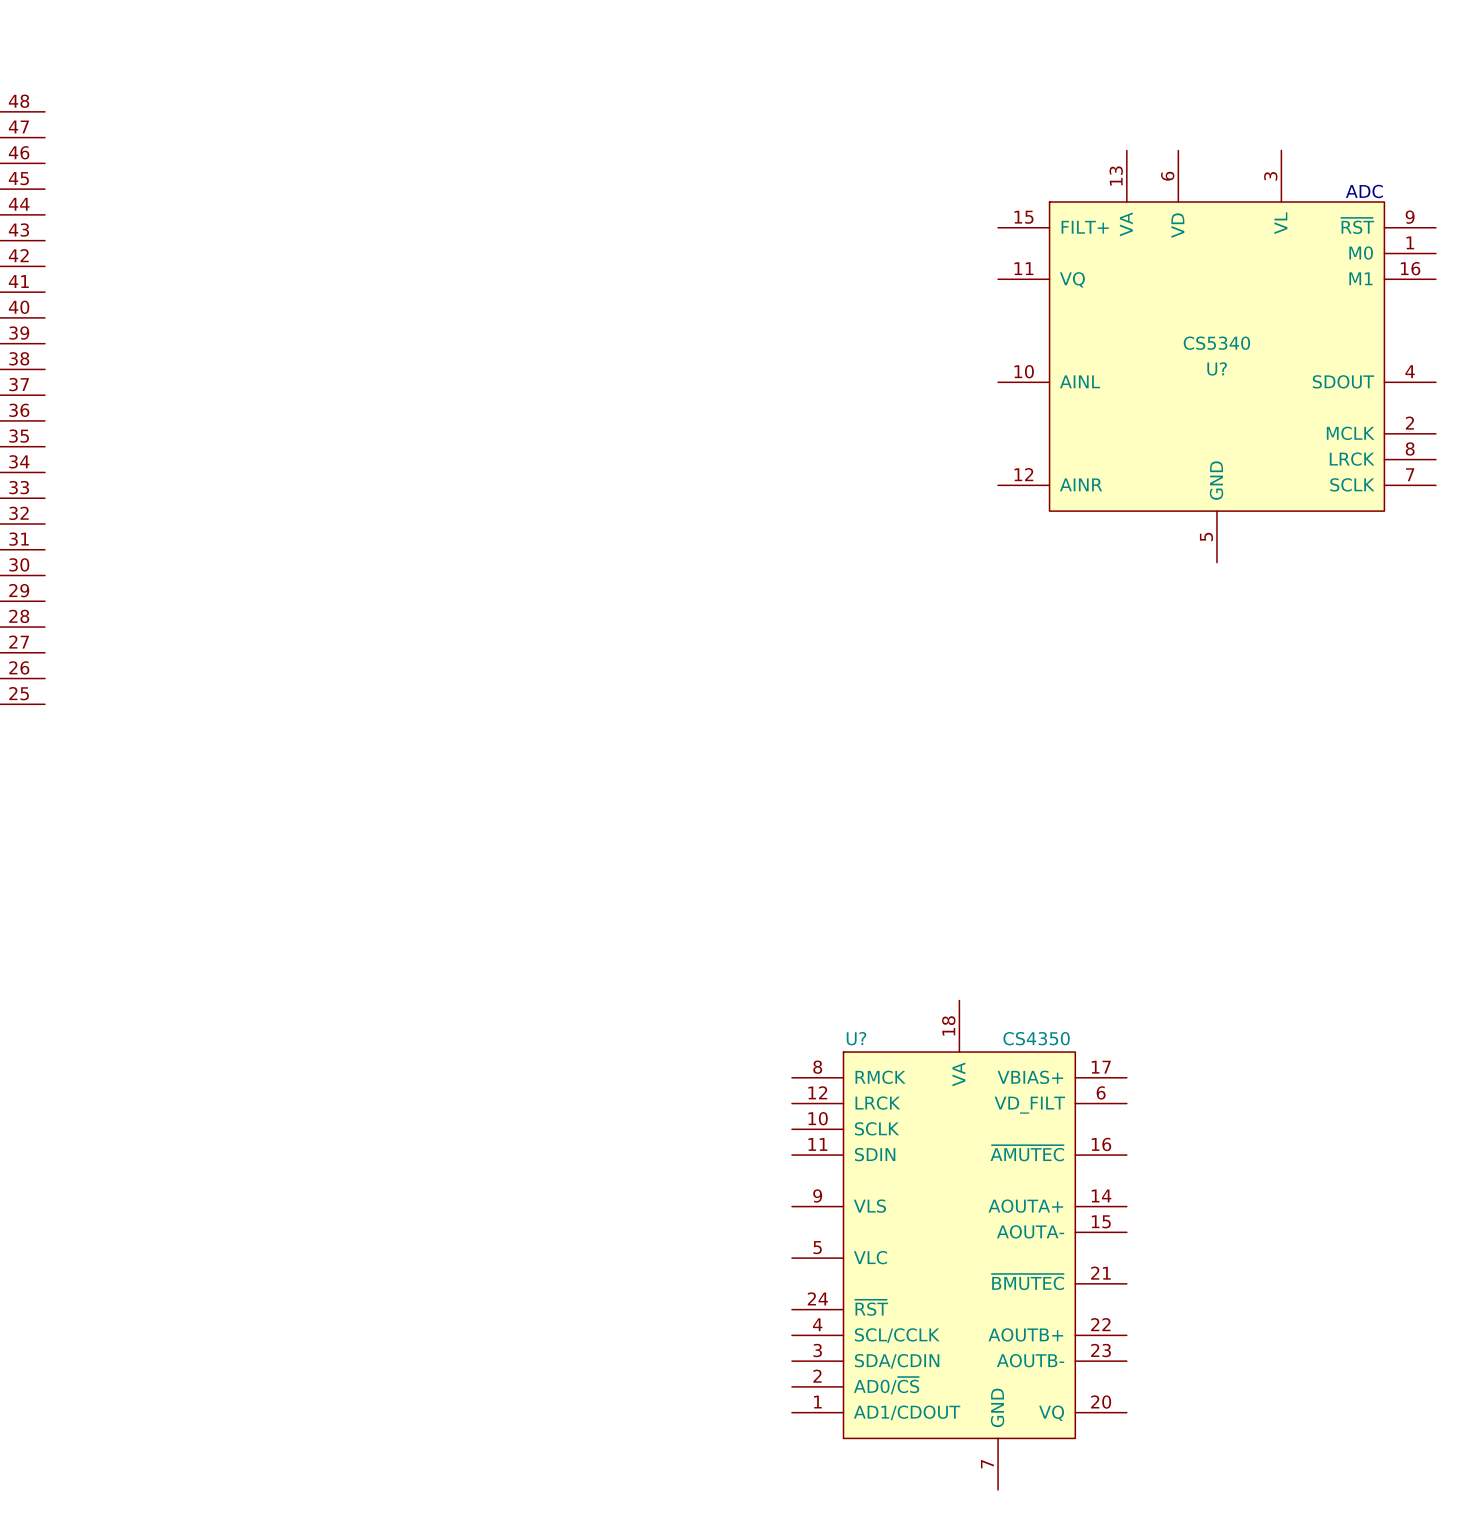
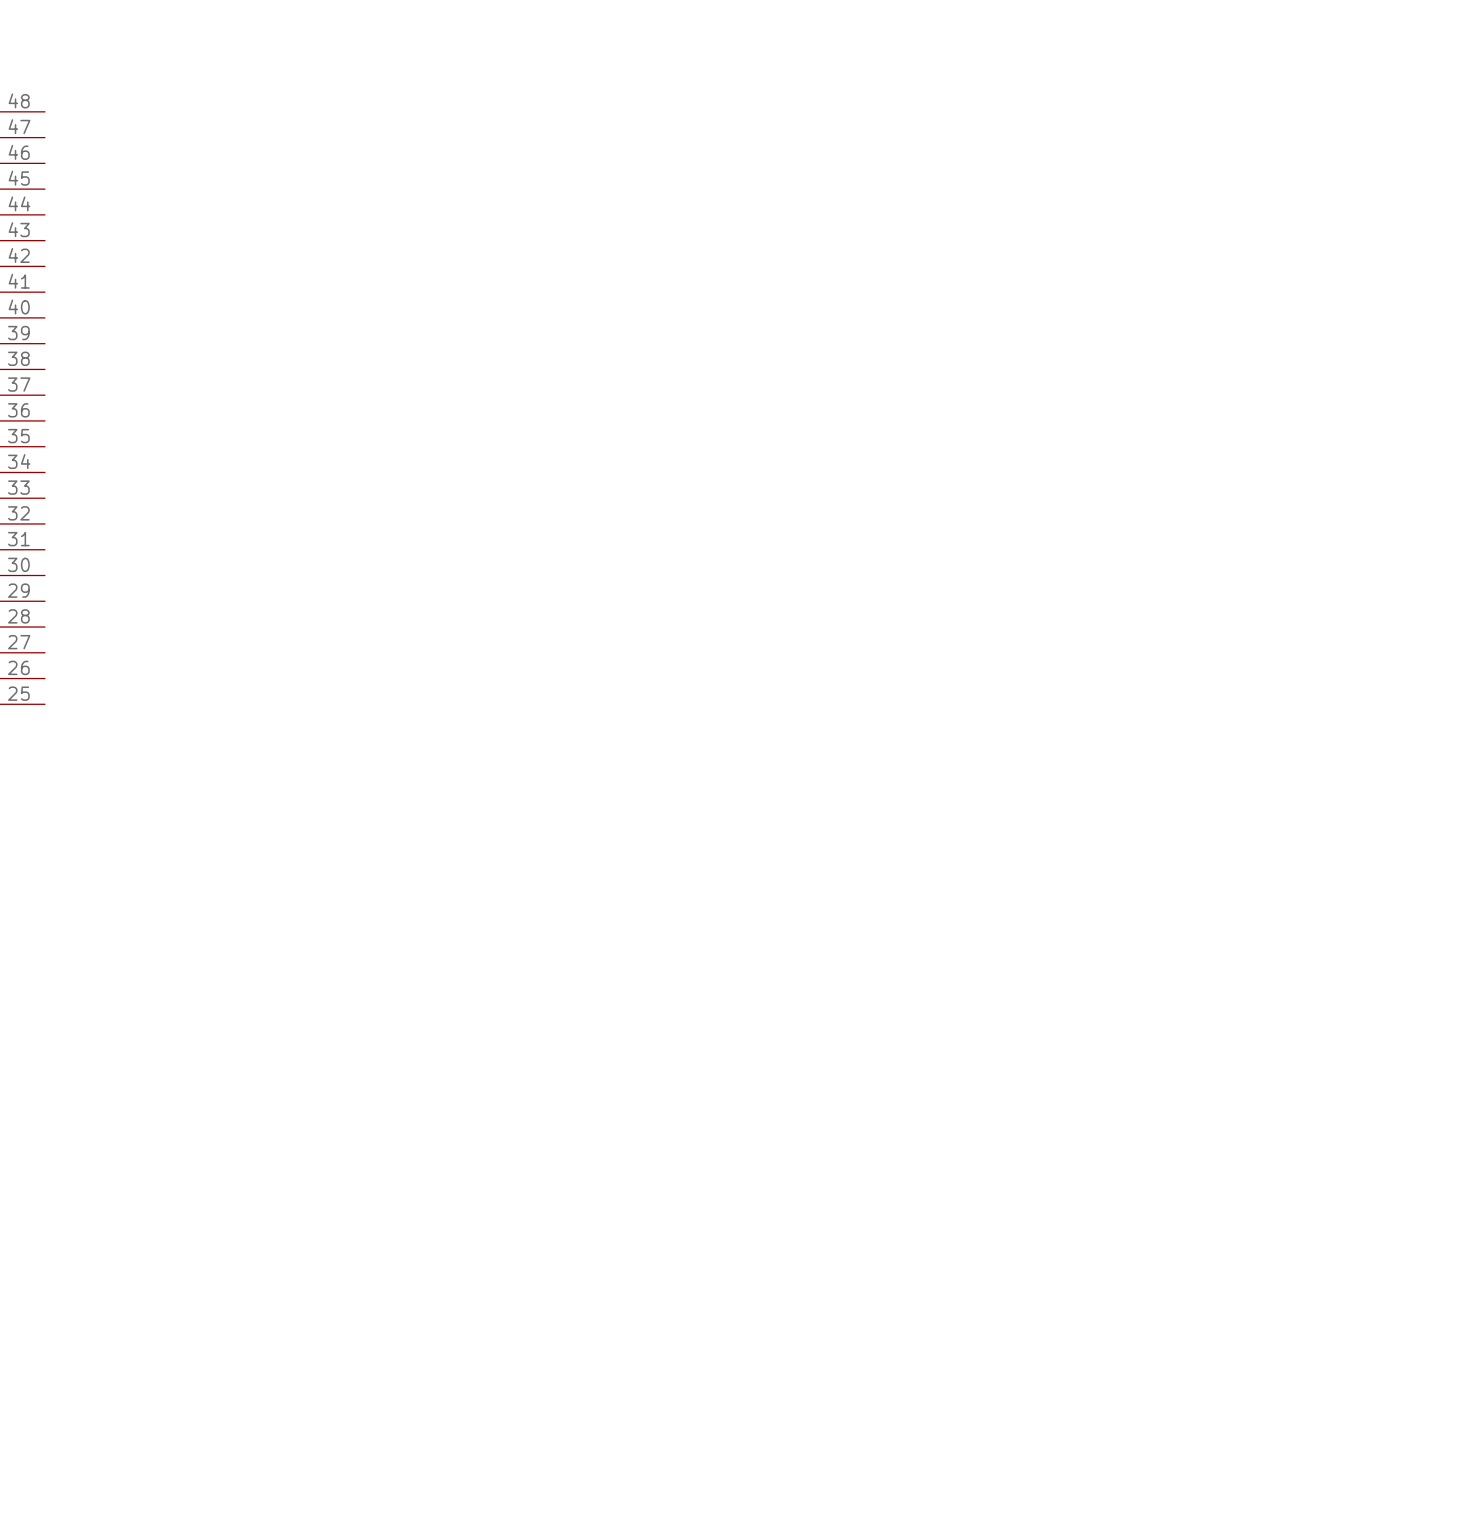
text: ADC (1364, 191) -> none
U?: CS5340 (1216, 356) -> none
U?: CS4350 (959, 1245) -> none

